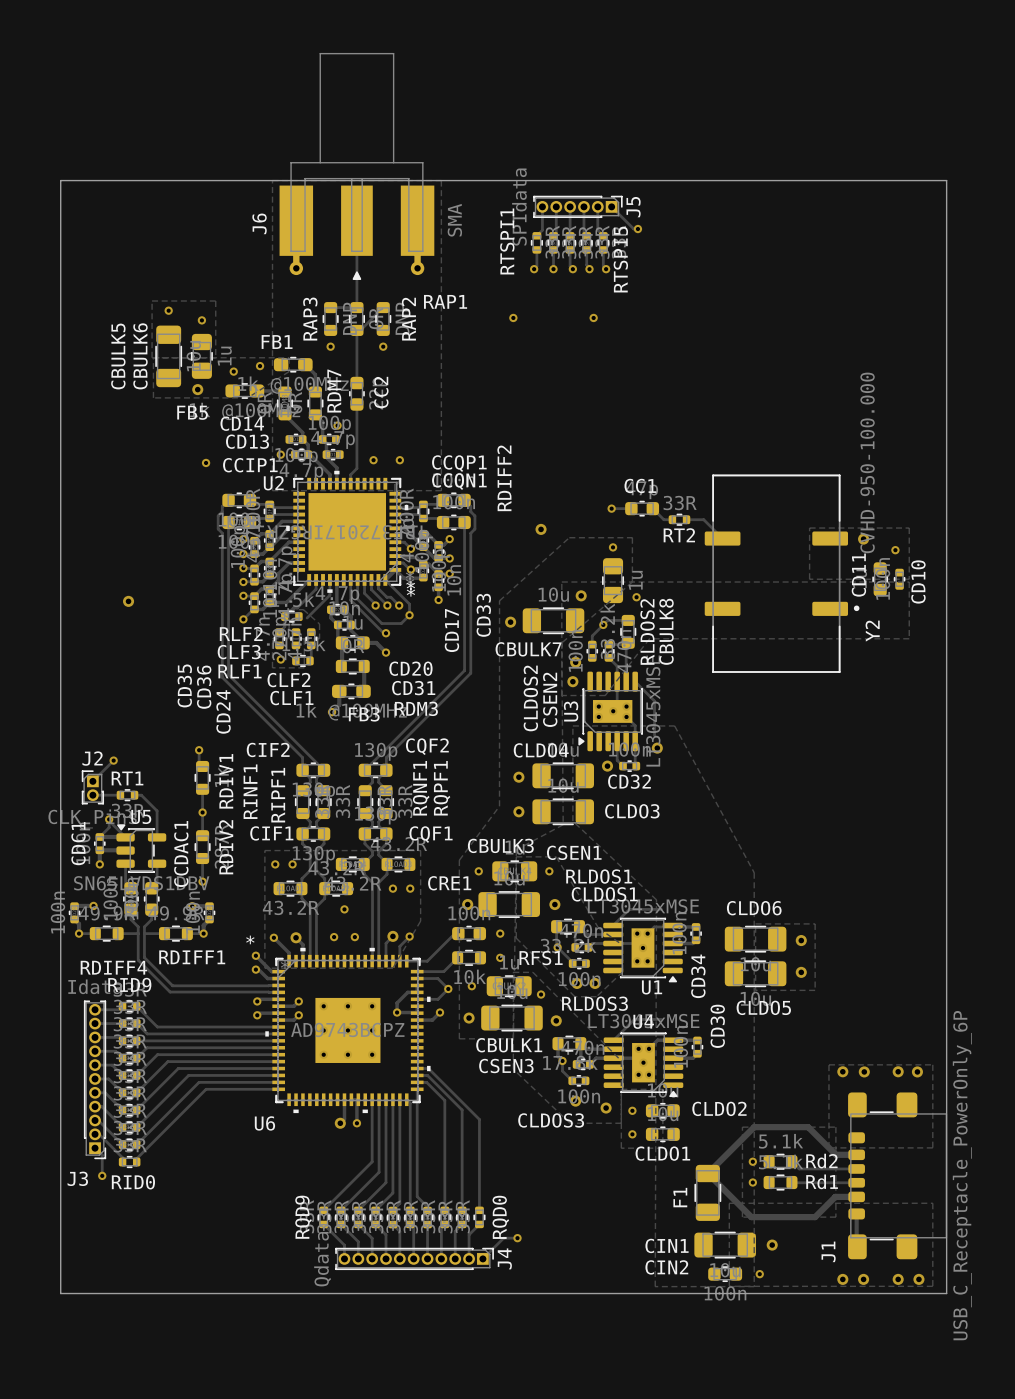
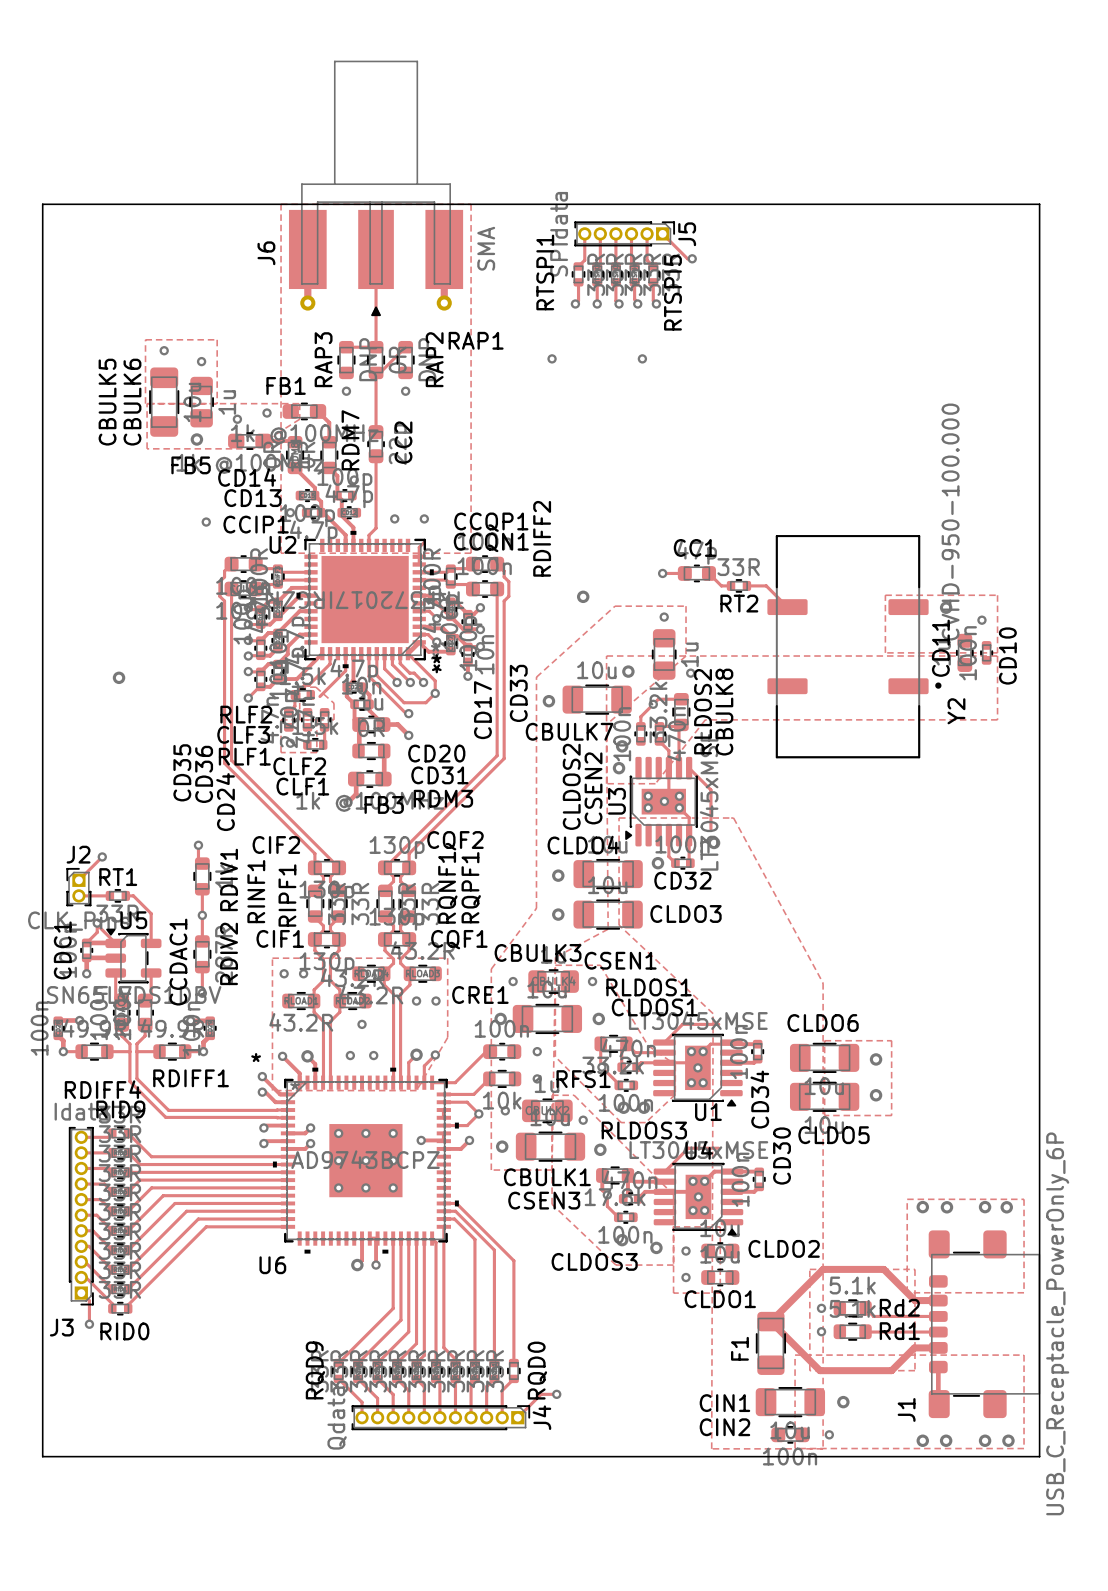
track: (417, 992) (407, 992) (397, 1003) (397, 1012) -> none

